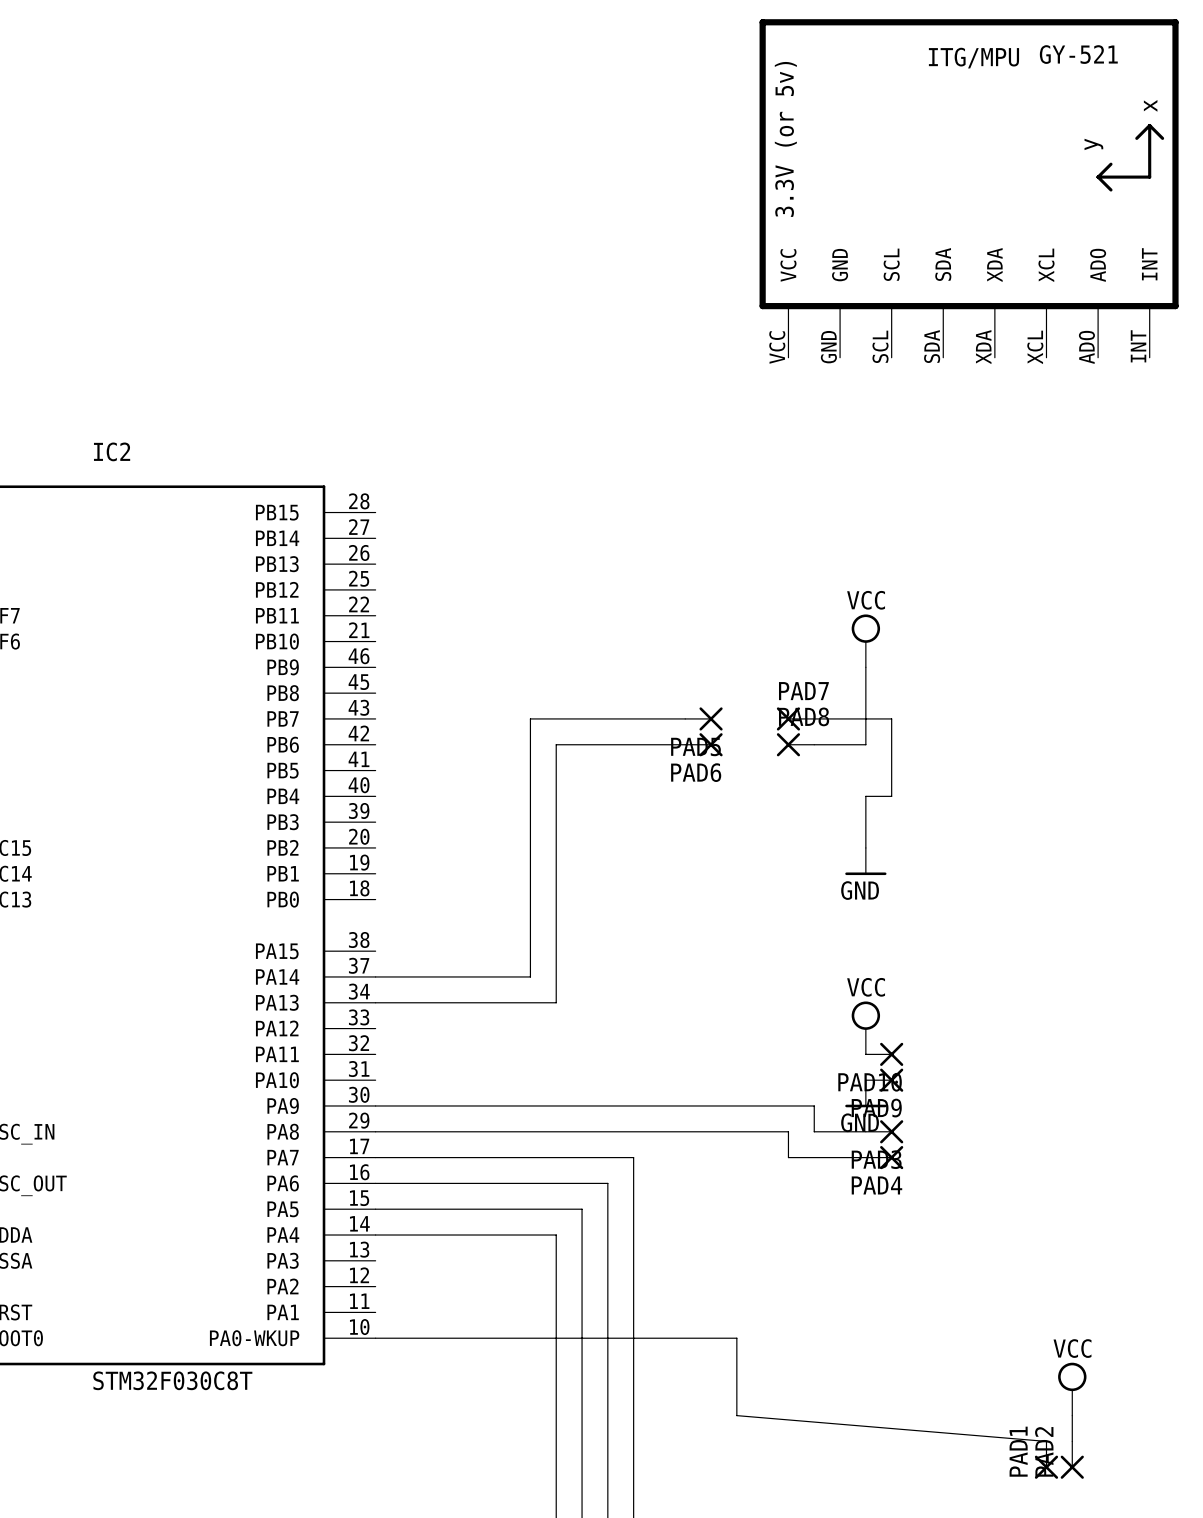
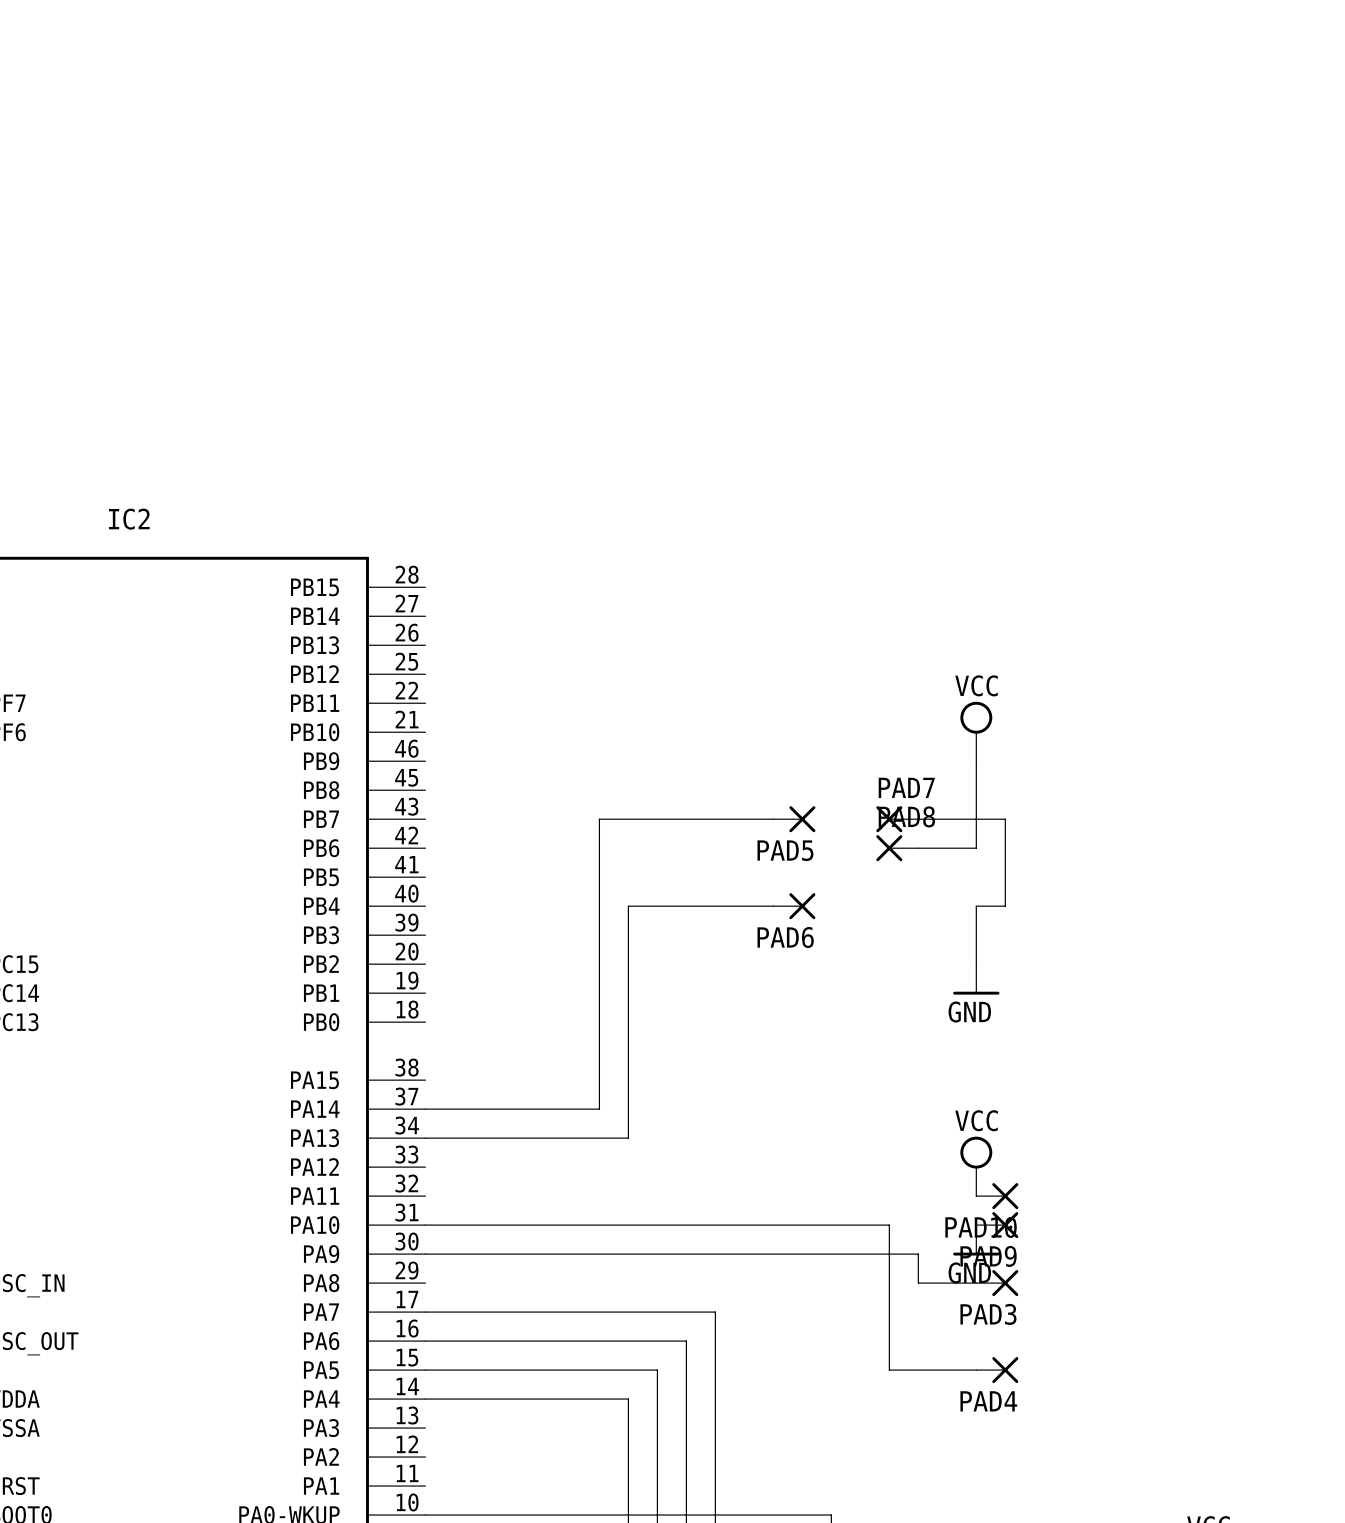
part: (969, 188) -> none
wire: (685, 744) (556, 744) (556, 796) -> (773, 906) (628, 906)
PAD6 position: (703, 744) -> (794, 906)
wire: (375, 1131) (788, 1131) -> (425, 1225) (889, 1225) (889, 1283)
wire: (788, 1157) (865, 1157) -> (889, 1312) (889, 1370) (976, 1370)
PAD4 position: (884, 1157) -> (997, 1370)

